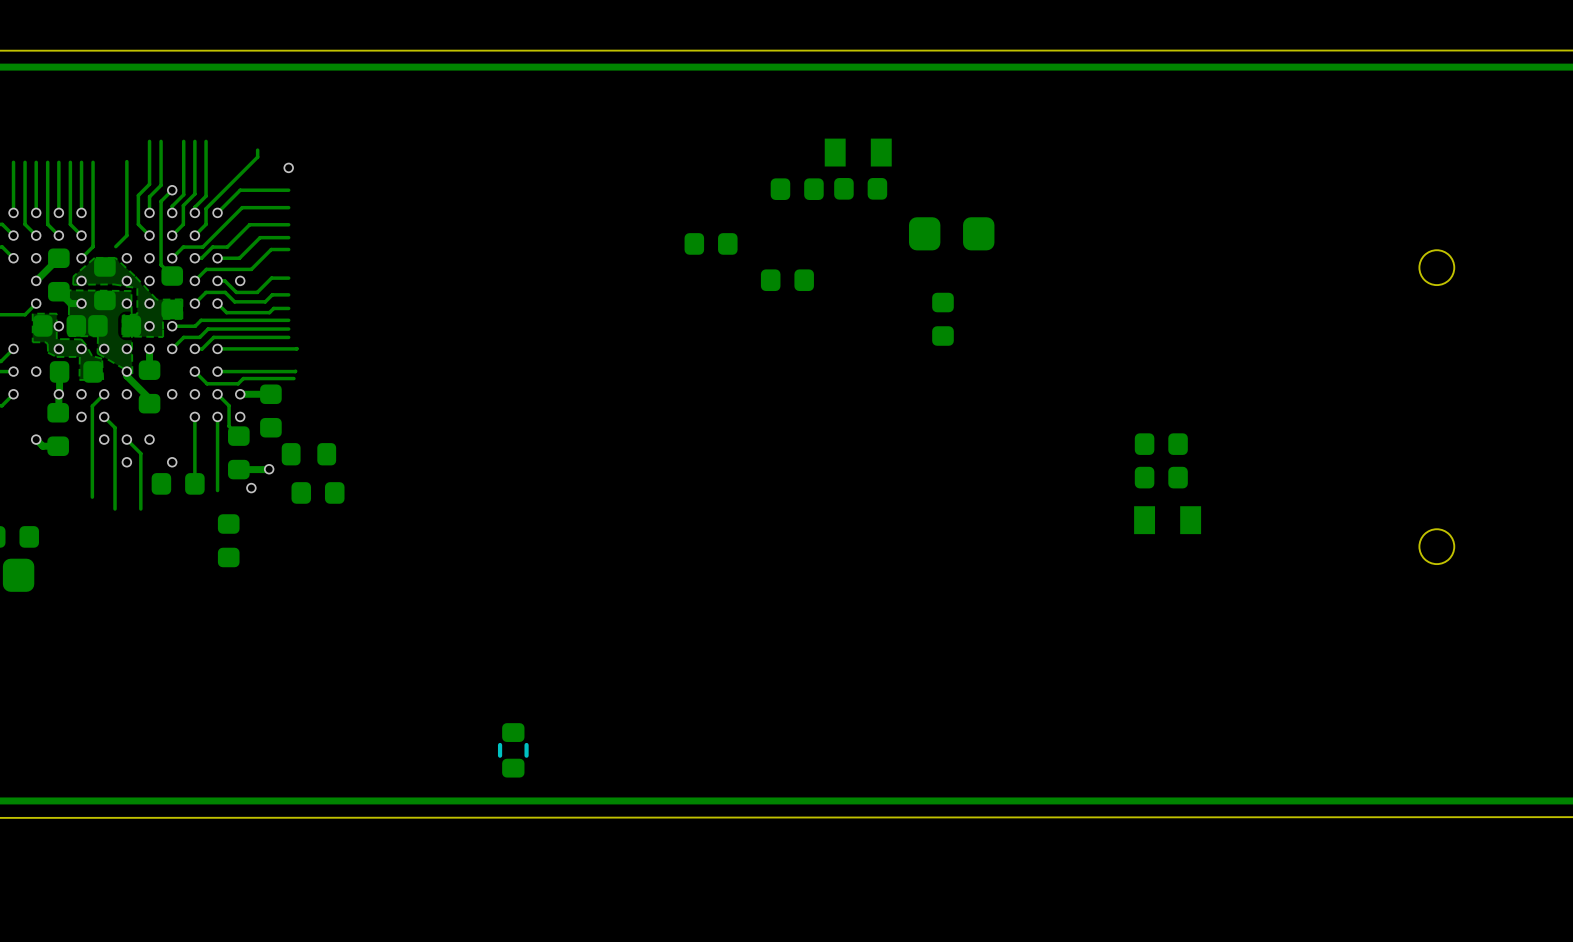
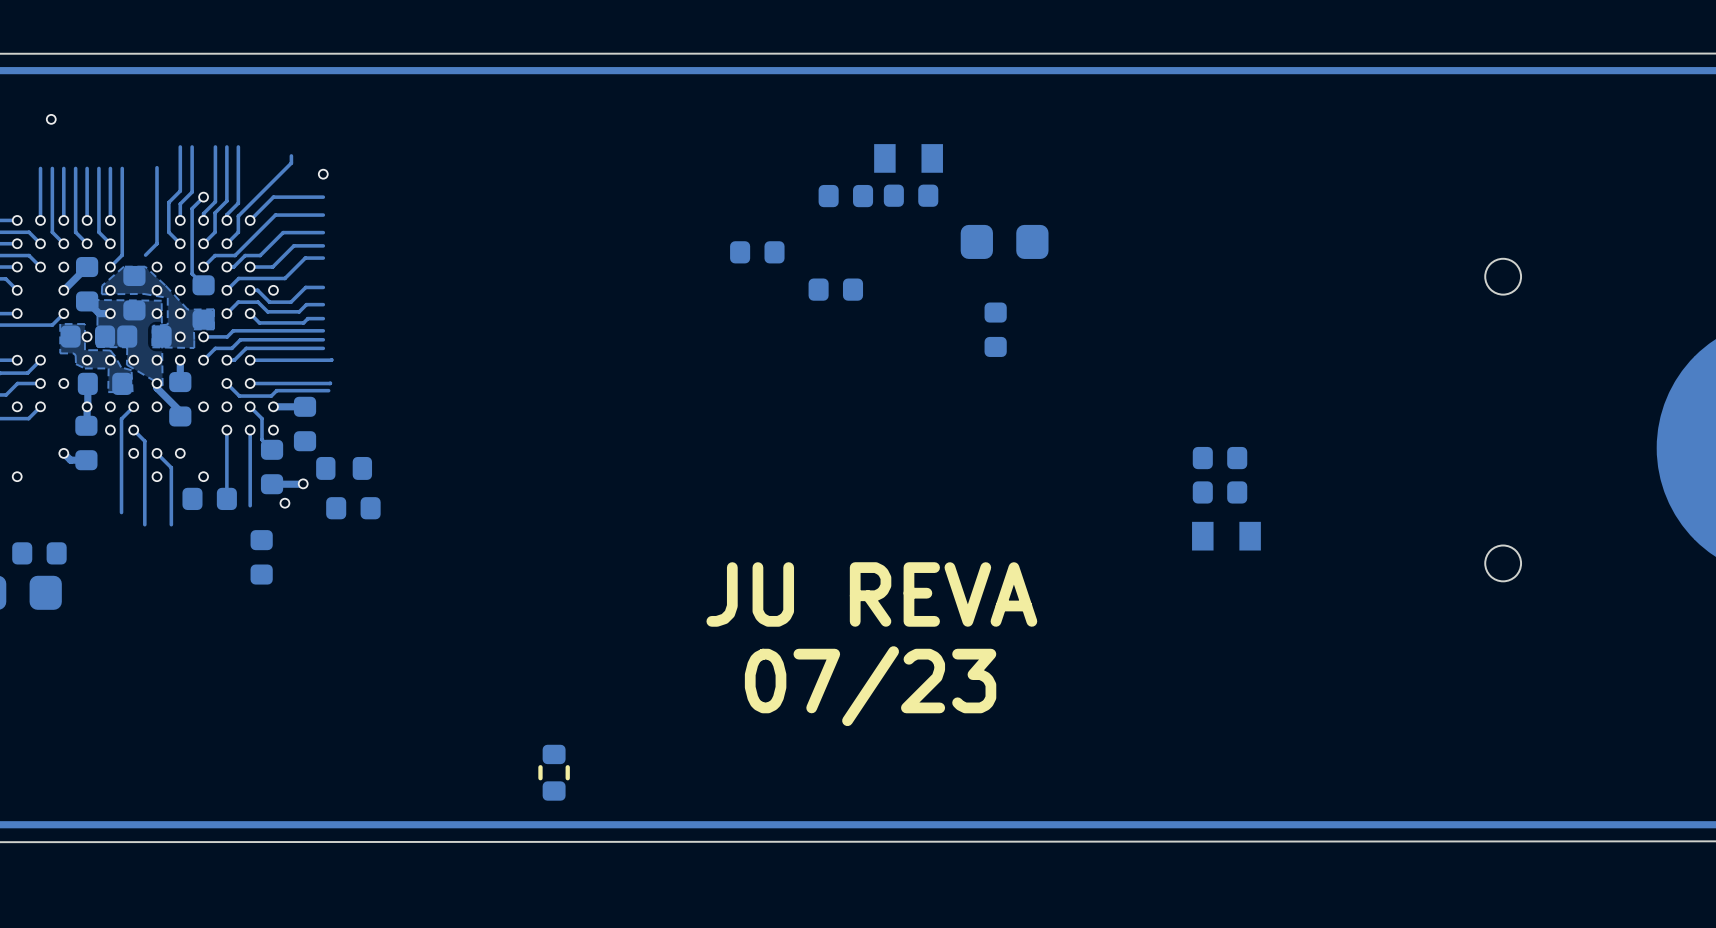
via: none -> (51, 119)
text: none -> JU REVA (871, 594)
text: none -> 07/23 (870, 686)

